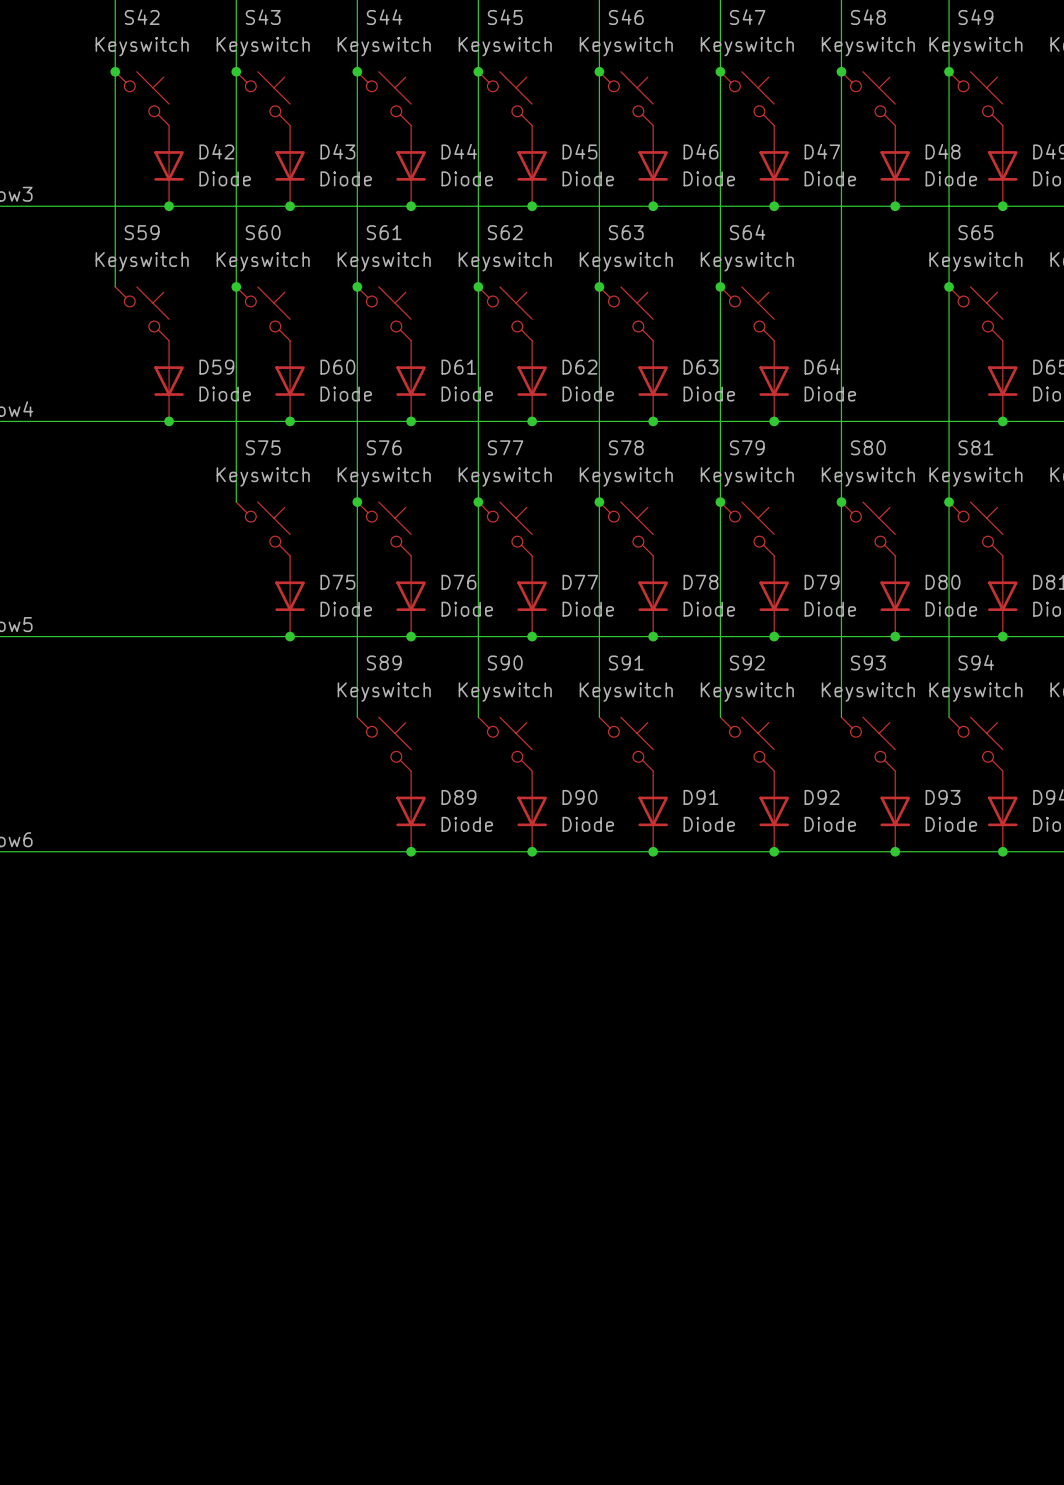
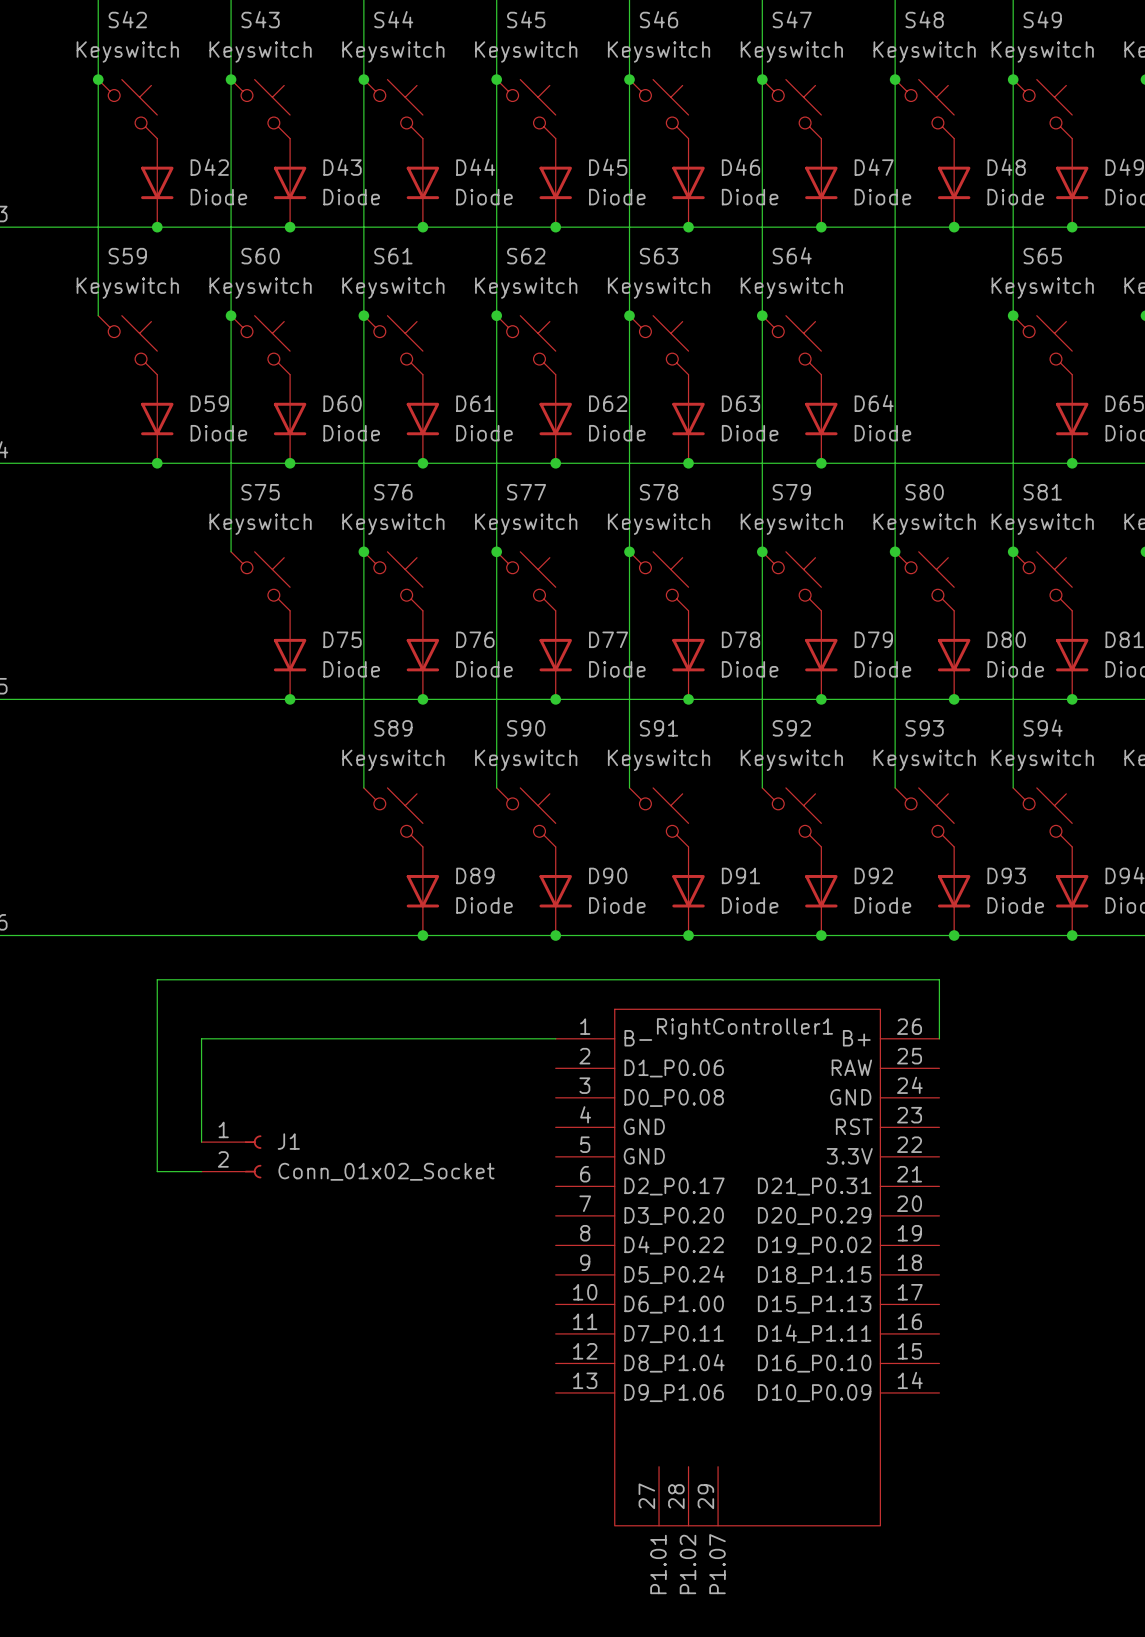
wire: none -> (555, 1038) (201, 1038) (201, 1142)
wire: none -> (939, 1038) (939, 979) (157, 979) (157, 1171) (201, 1171)
J1: none -> Conn_01x02_Socket (231, 1156)
RightController1: none -> (747, 1267)

